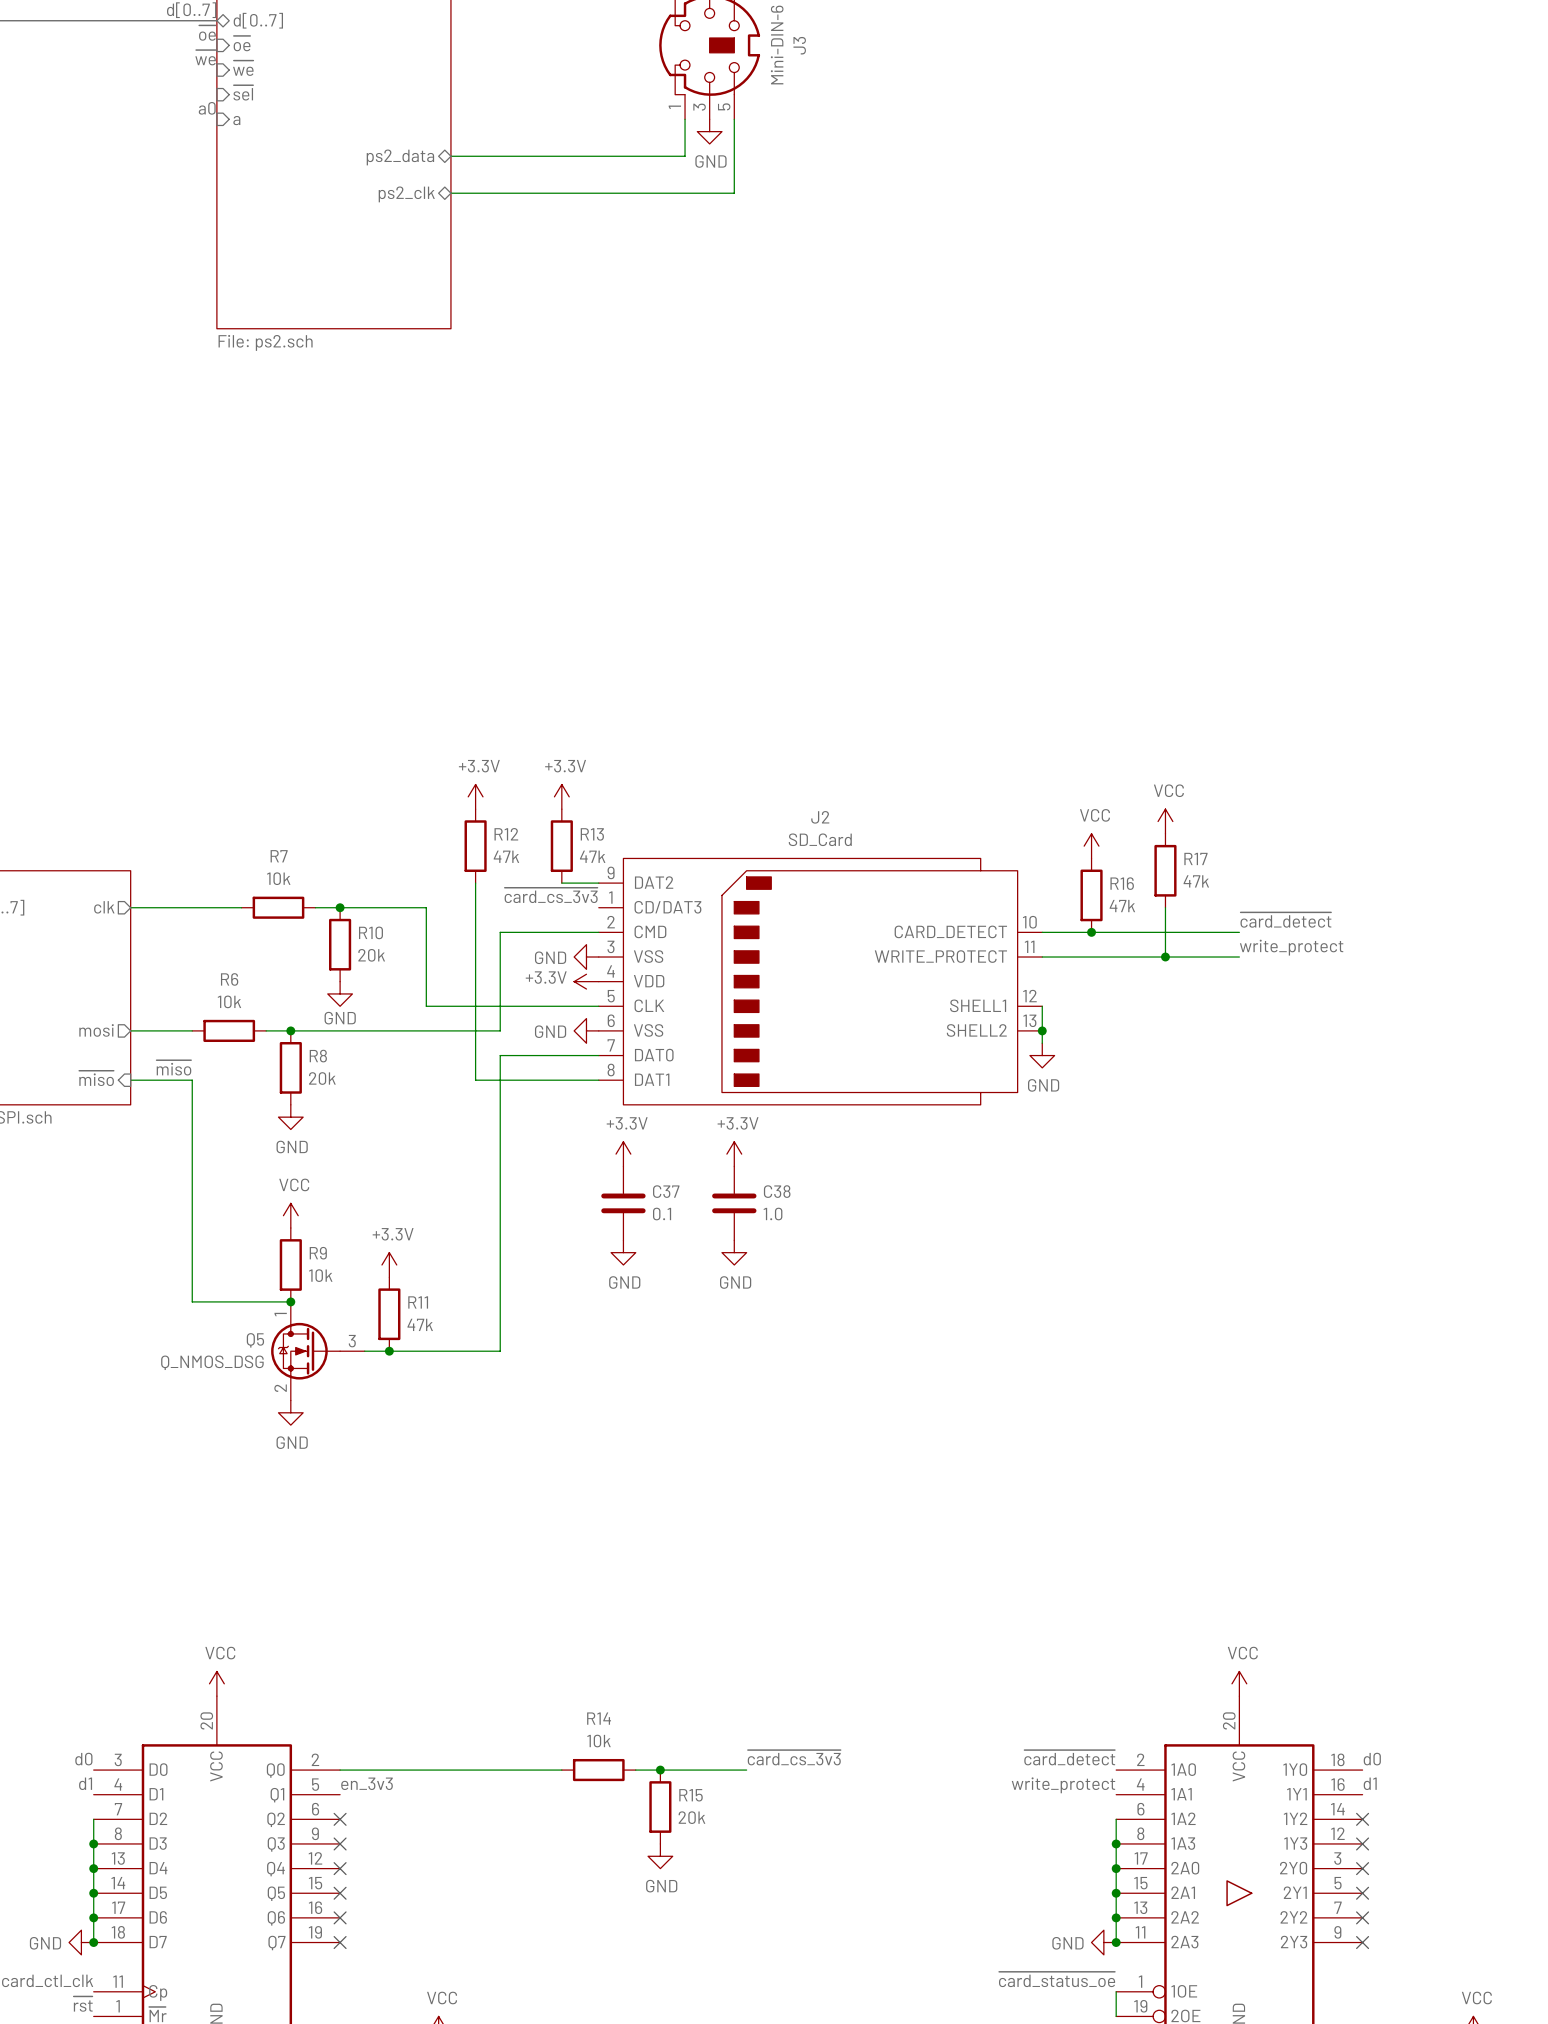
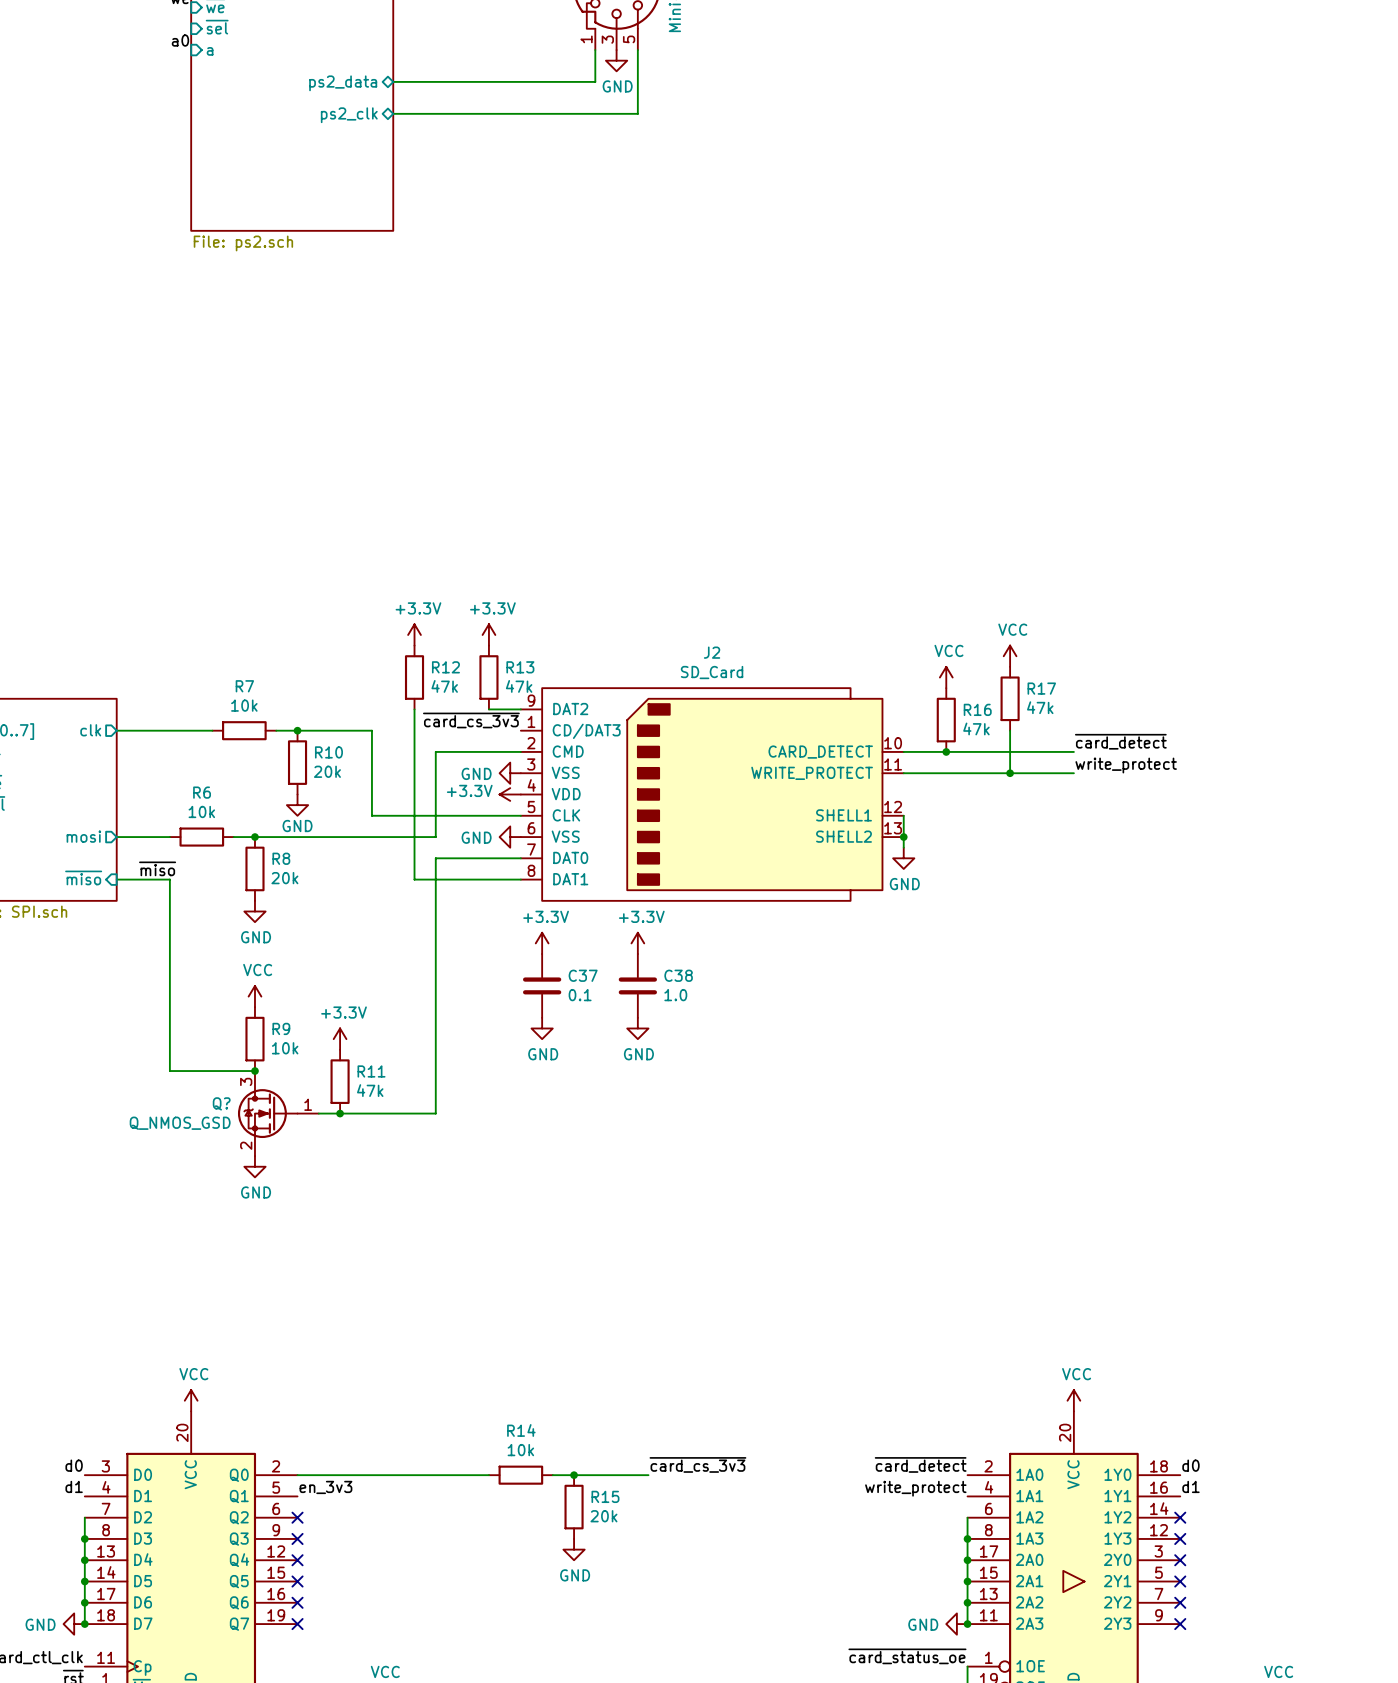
Q5 pin number: 1 (280, 1314) -> 3 (246, 1081)
Q5 name: Q5 (255, 1340) -> Q? (221, 1103)
Q5 pin number: 3 (352, 1341) -> 1 (308, 1104)
Q5 value: Q_NMOS_DSG (212, 1362) -> Q_NMOS_GSD (180, 1123)

